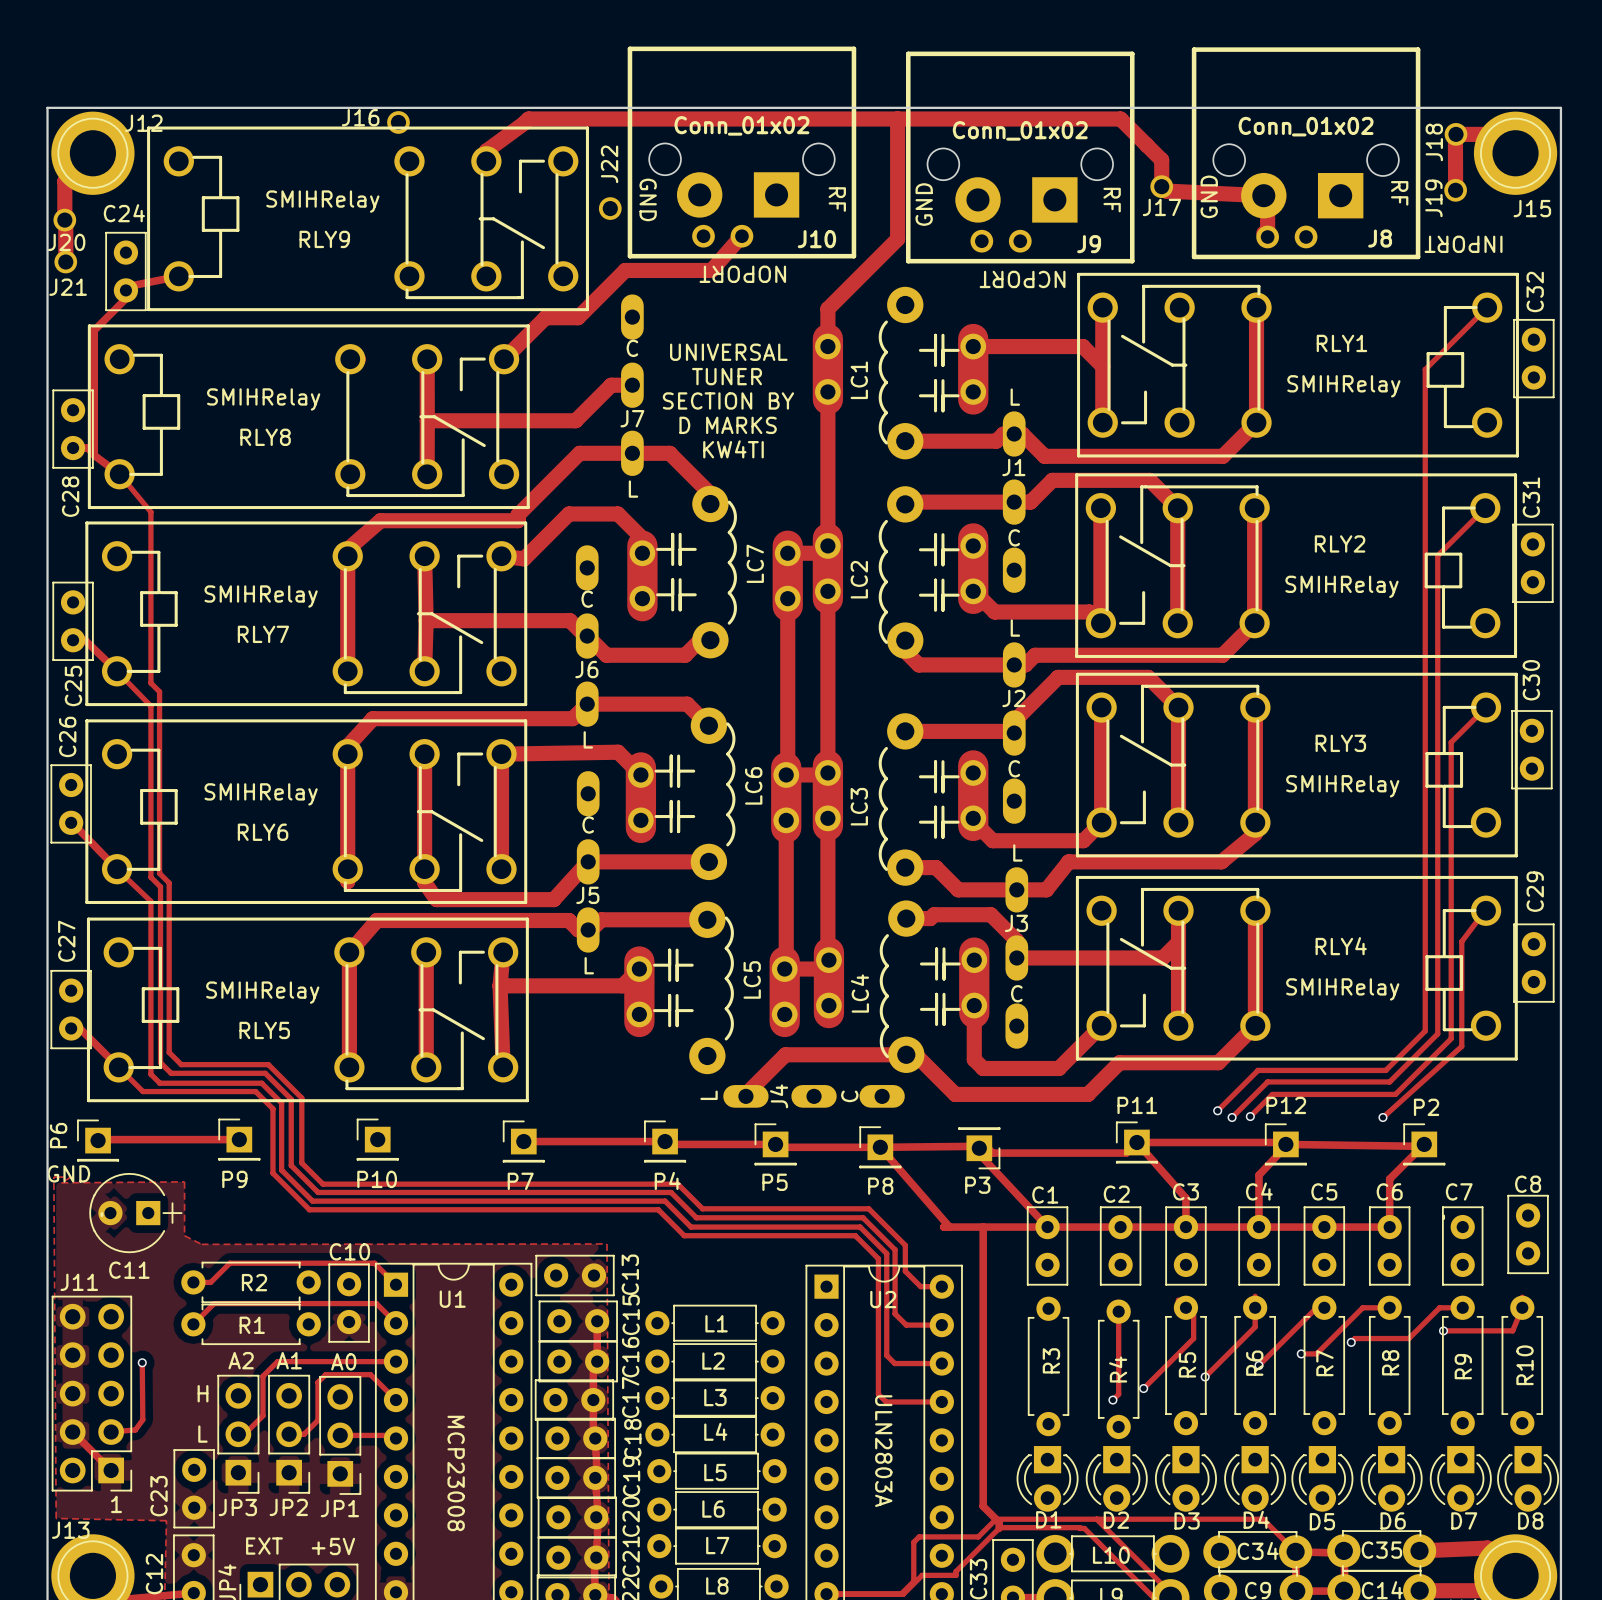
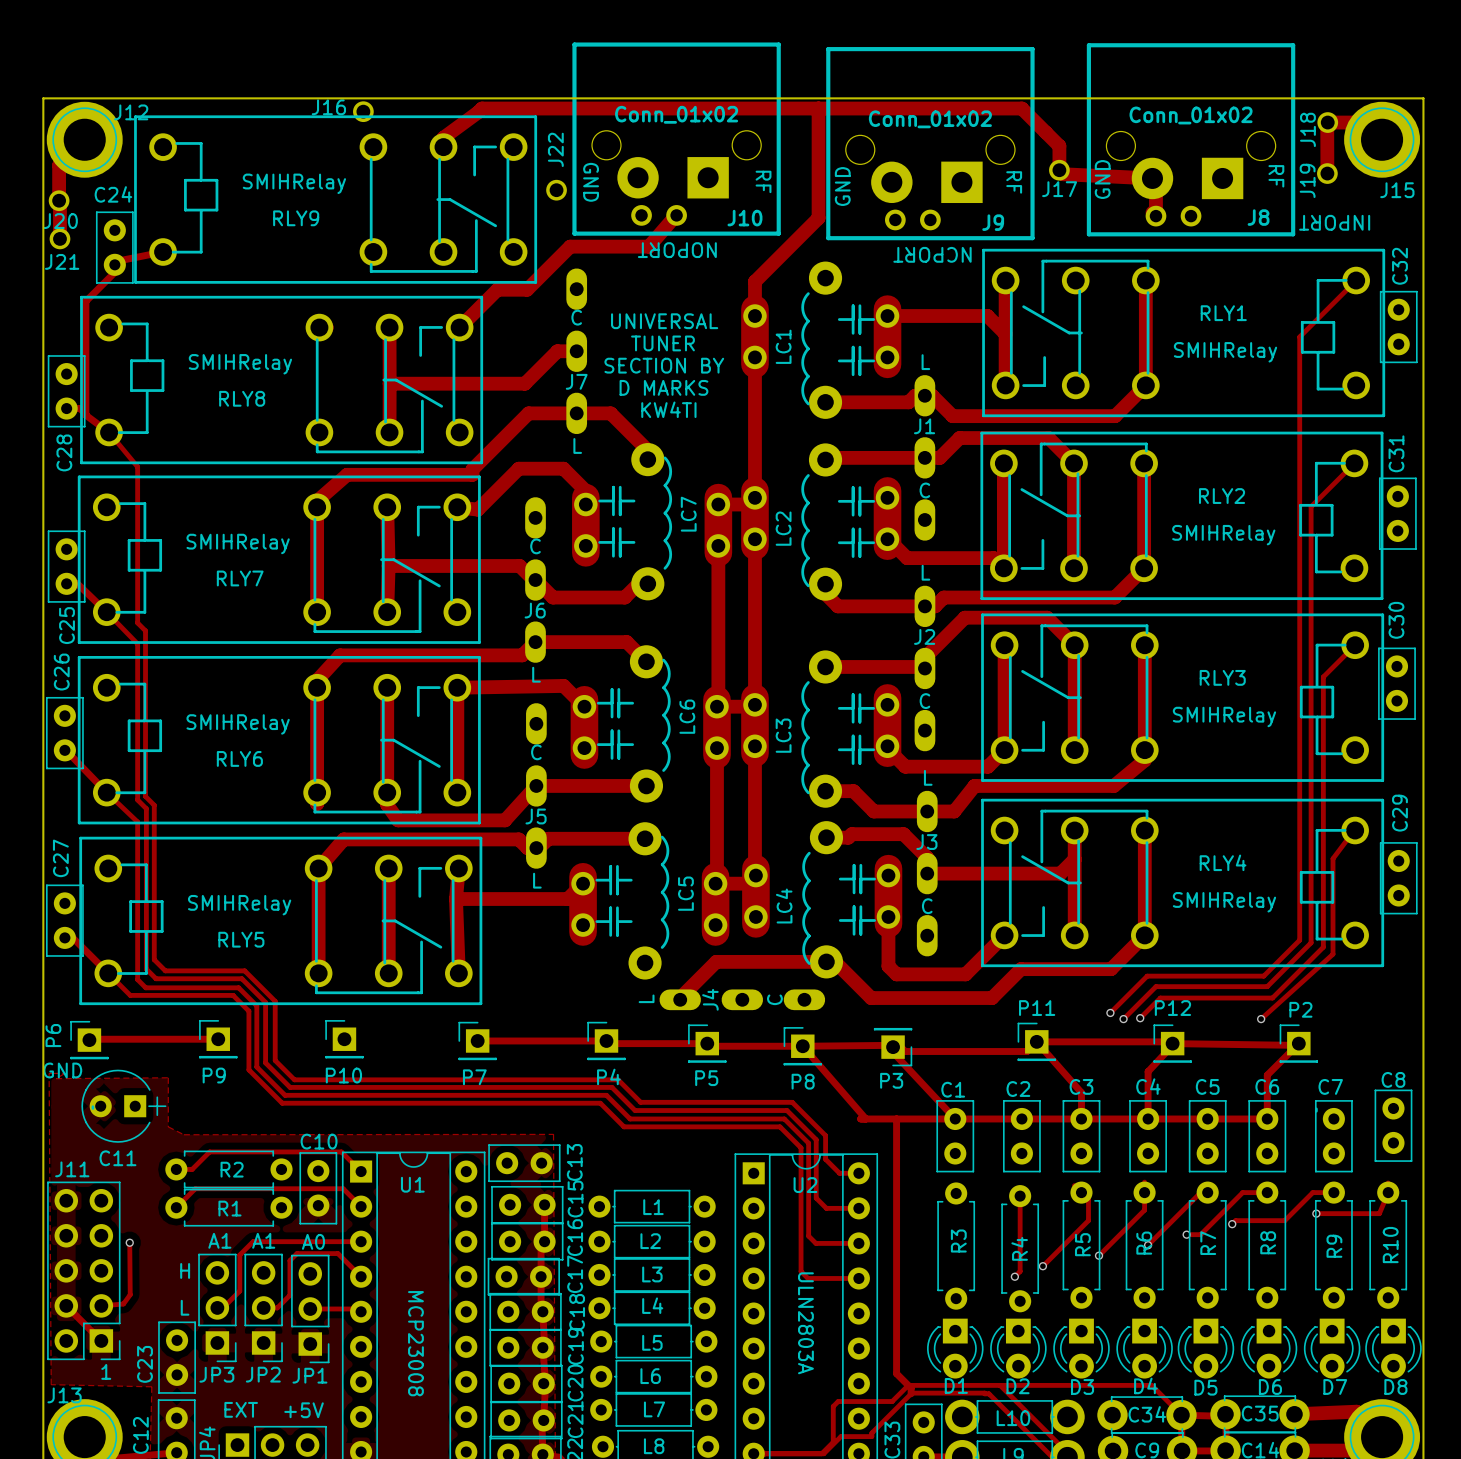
text: A2 (241, 1360) -> A1 (219, 1240)

